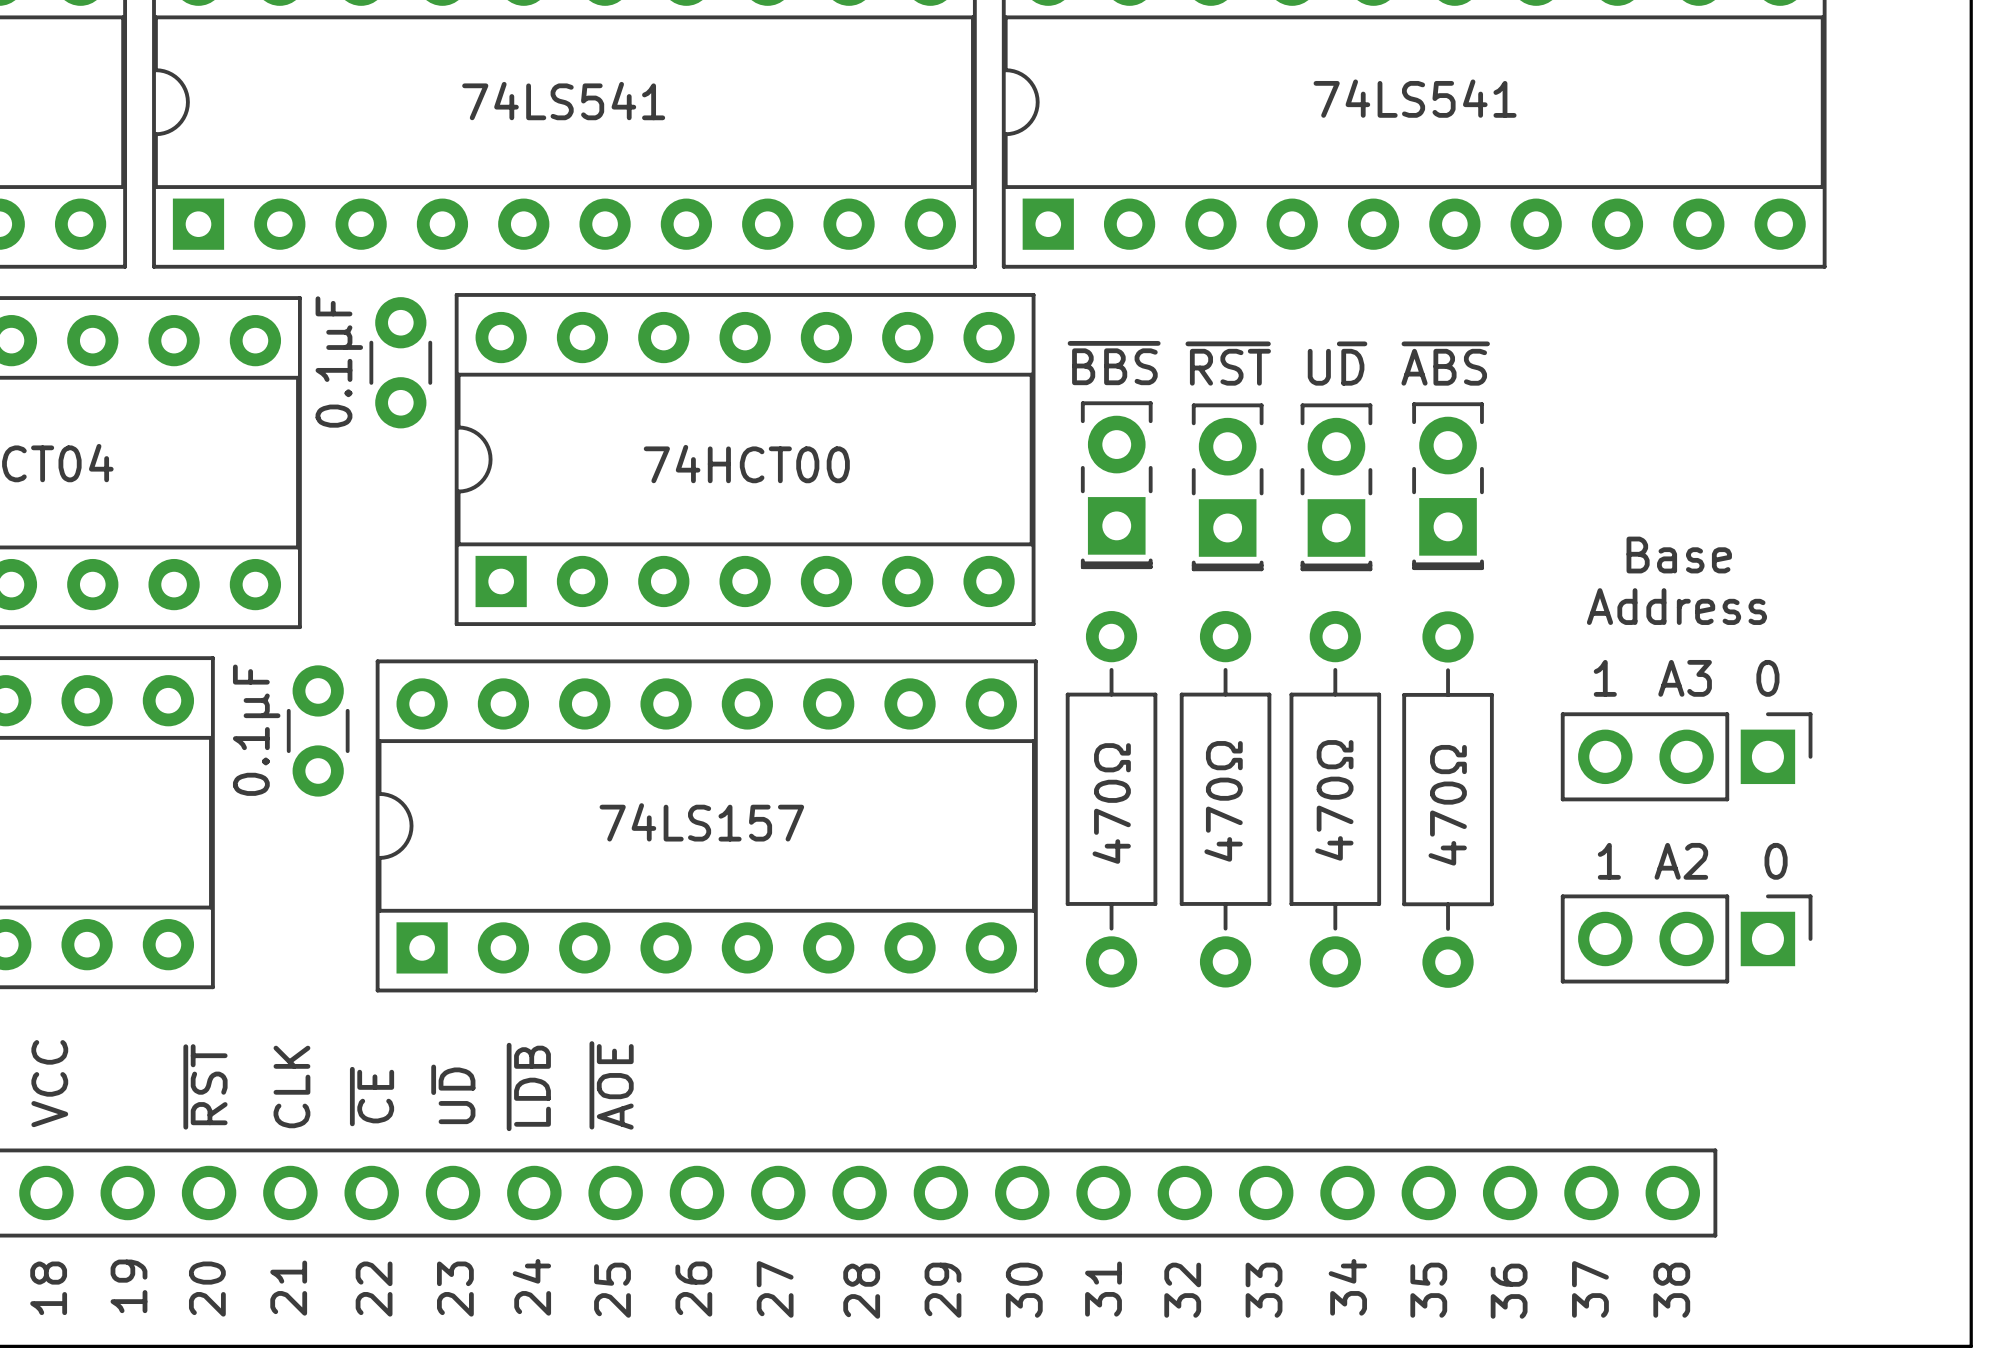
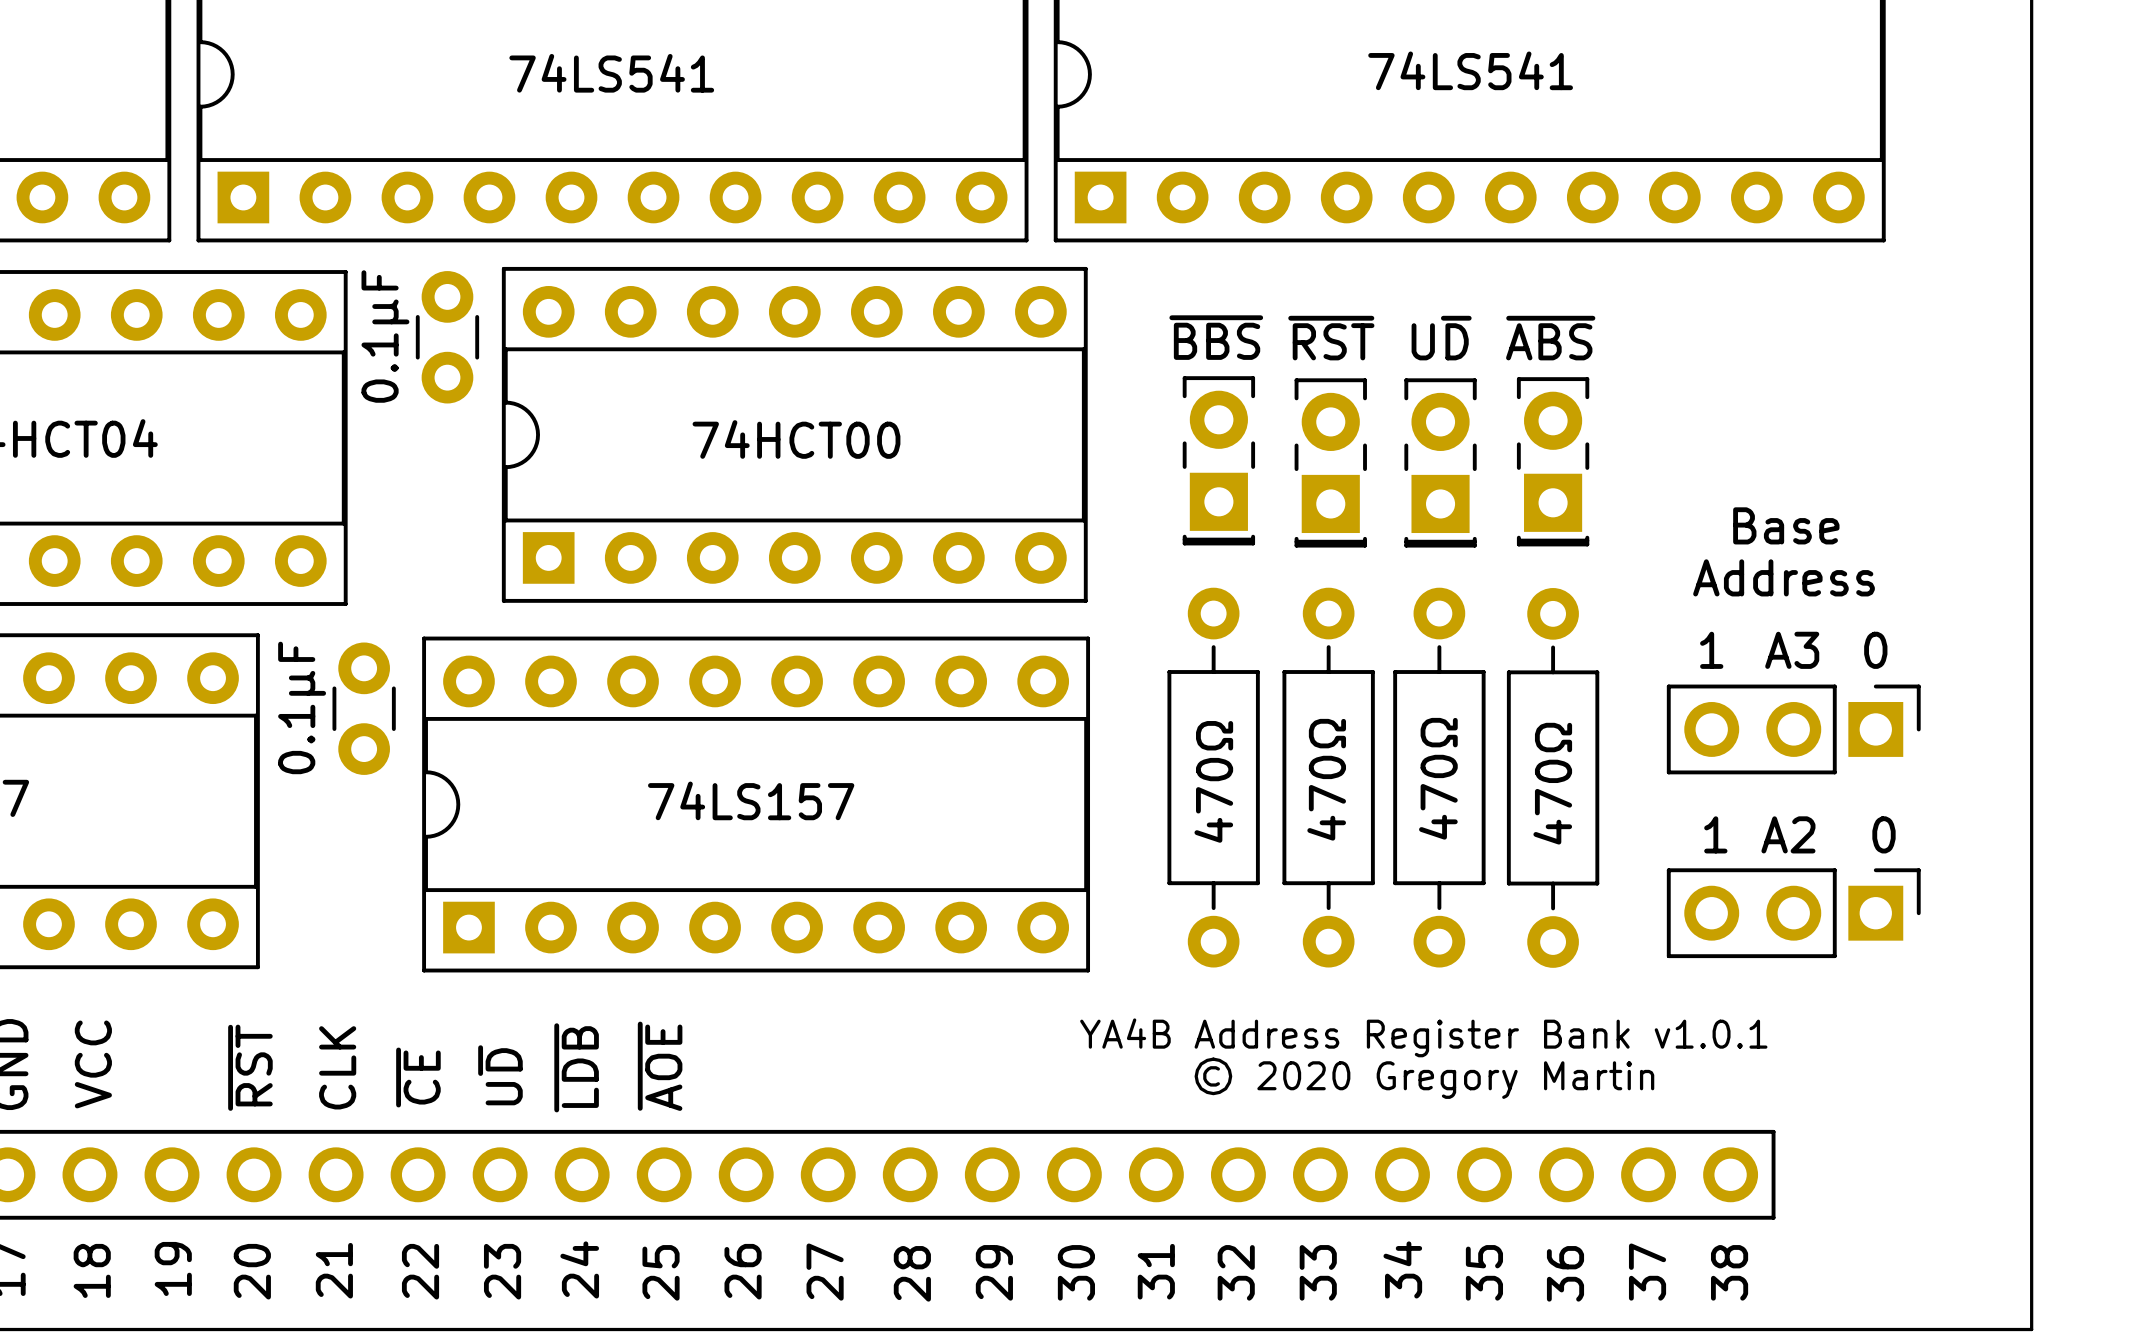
part position: (1116, 485) -> (1218, 460)
part position: (1448, 486) -> (1553, 461)
part position: (1227, 487) -> (1330, 462)
part position: (1336, 487) -> (1440, 462)
text position: Base (1679, 555) -> Base (1786, 525)
text position: Address (1676, 606) -> Address (1784, 577)
text position: 1 (1605, 678) -> 1 (1711, 650)
text position: 0 (1767, 678) -> 0 (1875, 650)
part position: (1686, 756) -> (1793, 729)
part: 470Ω (1111, 799) -> none
part: none -> 470Ω (1213, 777)
part: 470Ω (1225, 799) -> none
part: none -> 470Ω (1328, 777)
part: 470Ω (1335, 799) -> none
part: none -> 470Ω (1439, 777)
part: 470Ω (1448, 799) -> none
part: none -> 470Ω (1553, 777)
text position: 1 (1609, 861) -> 1 (1715, 834)
text position: 0 (1776, 861) -> 0 (1883, 834)
part position: (1686, 938) -> (1793, 913)
text: none -> YA4B Address Register Bank v1.0.1 (1423, 1037)
text: none -> © 2020 Gregory Martin (1424, 1078)

